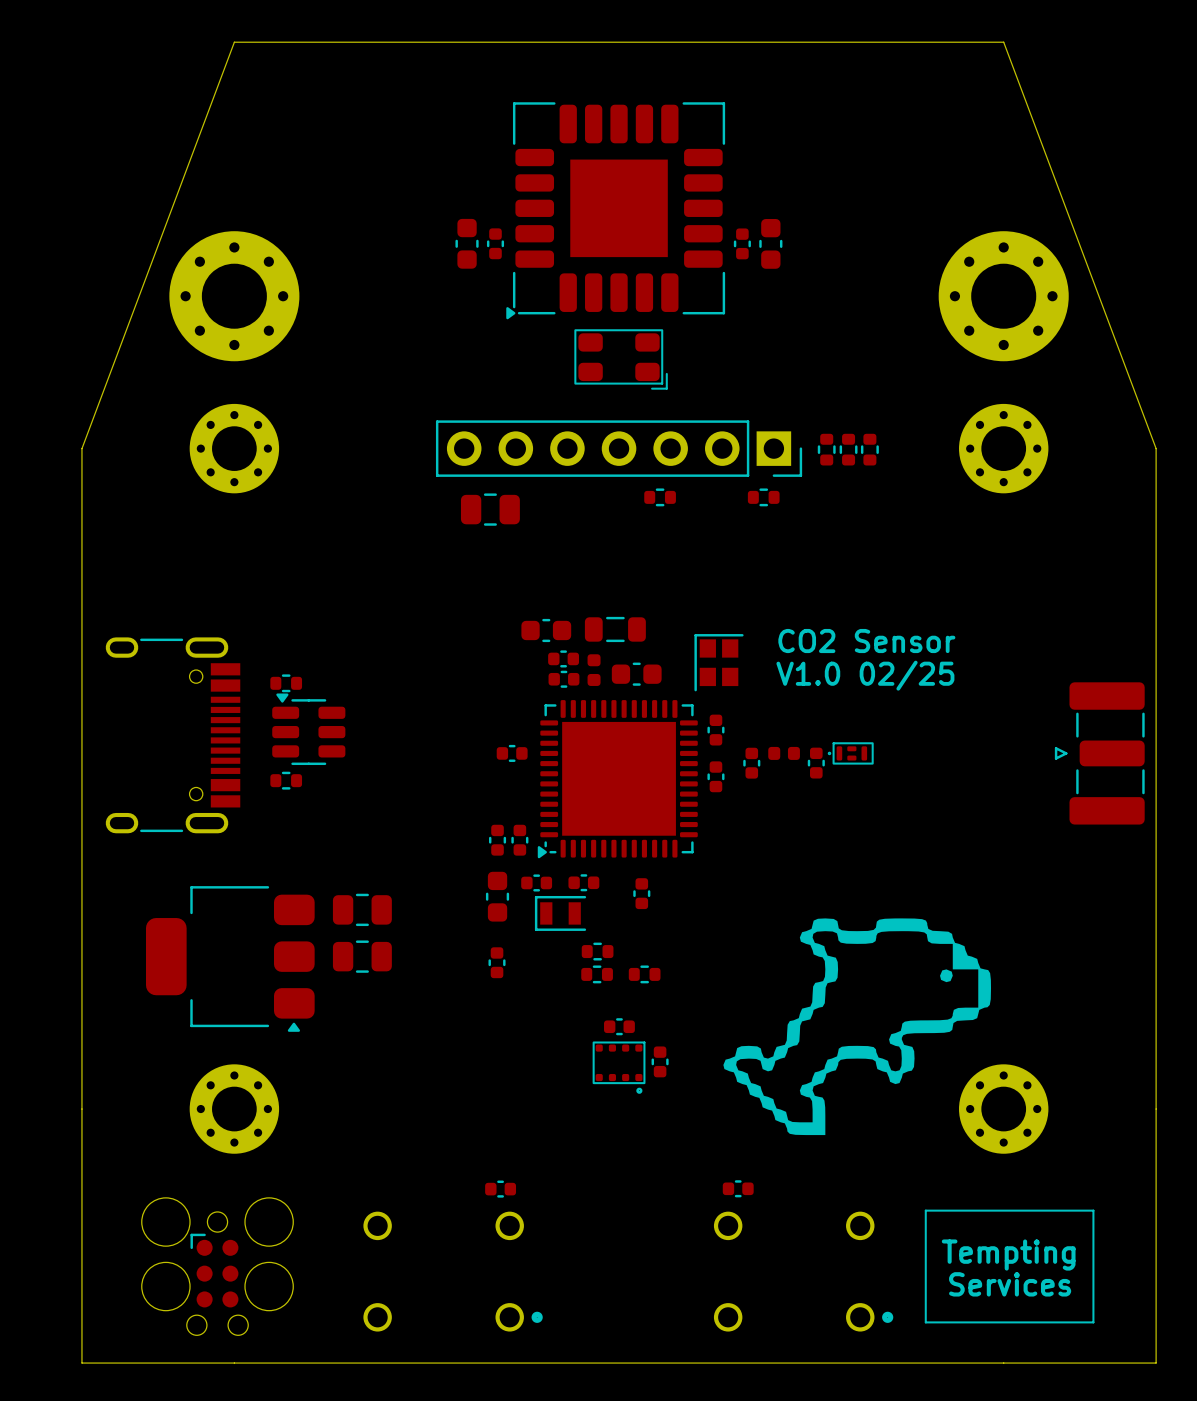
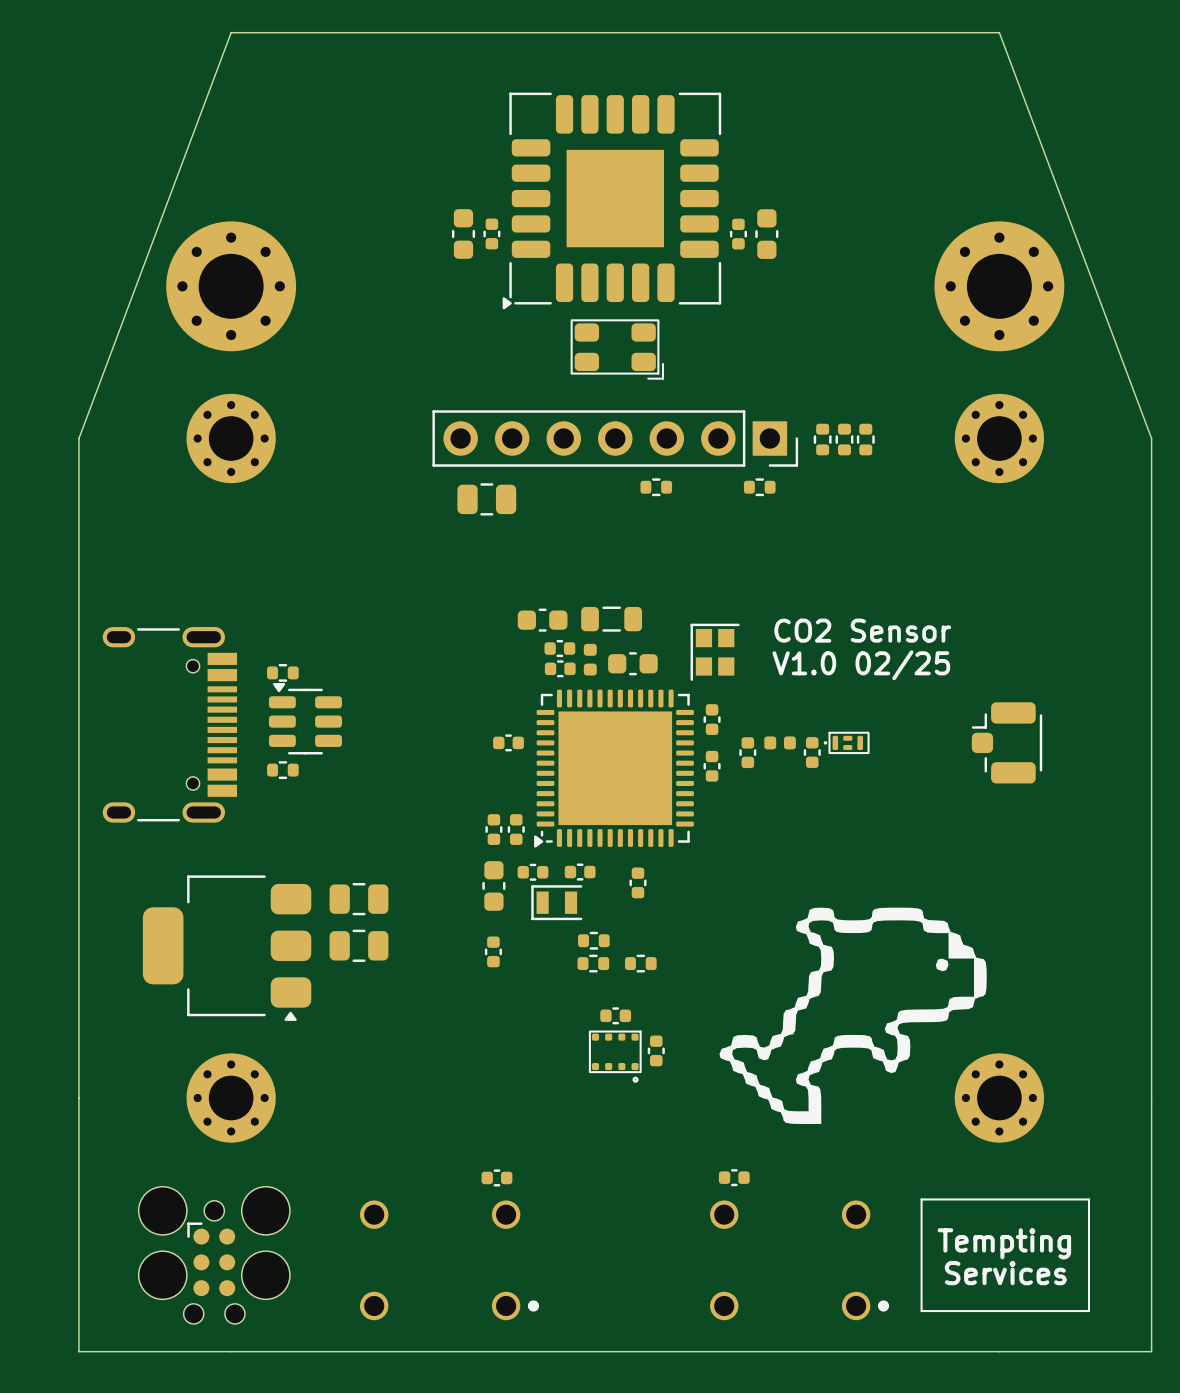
part: none -> (1007, 742)
part: (1099, 753) -> none

